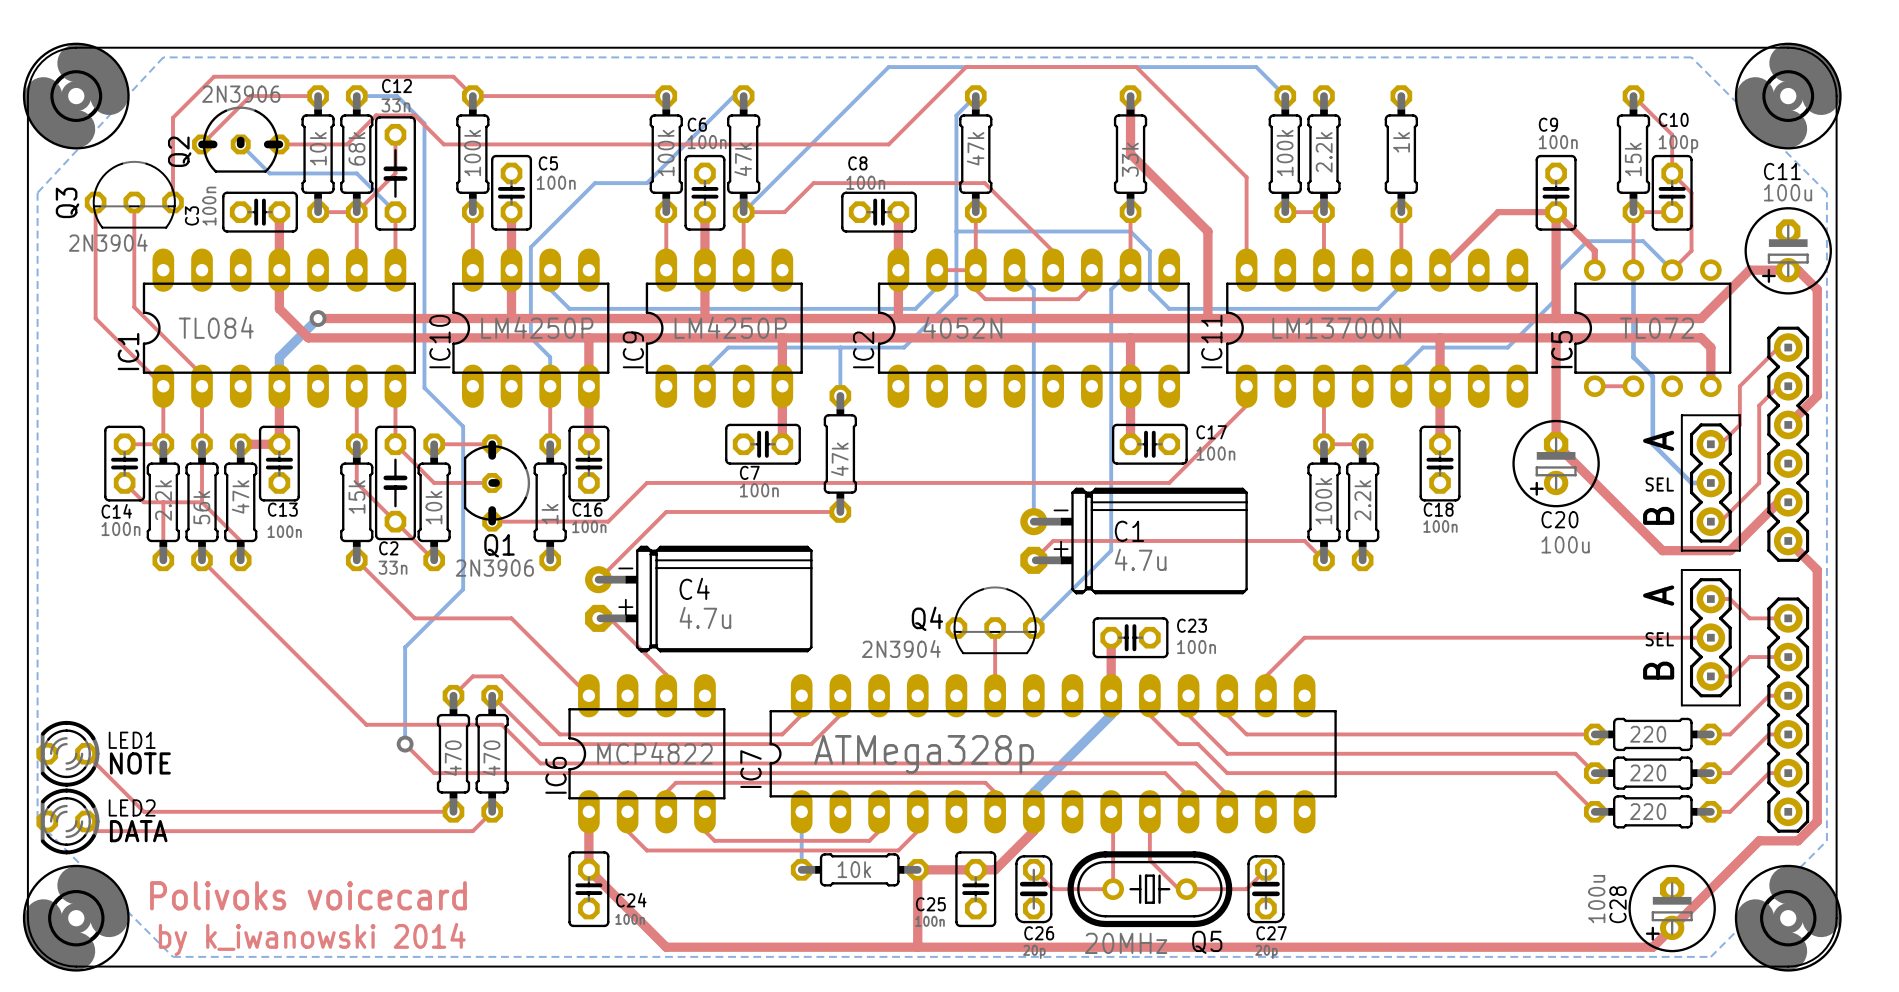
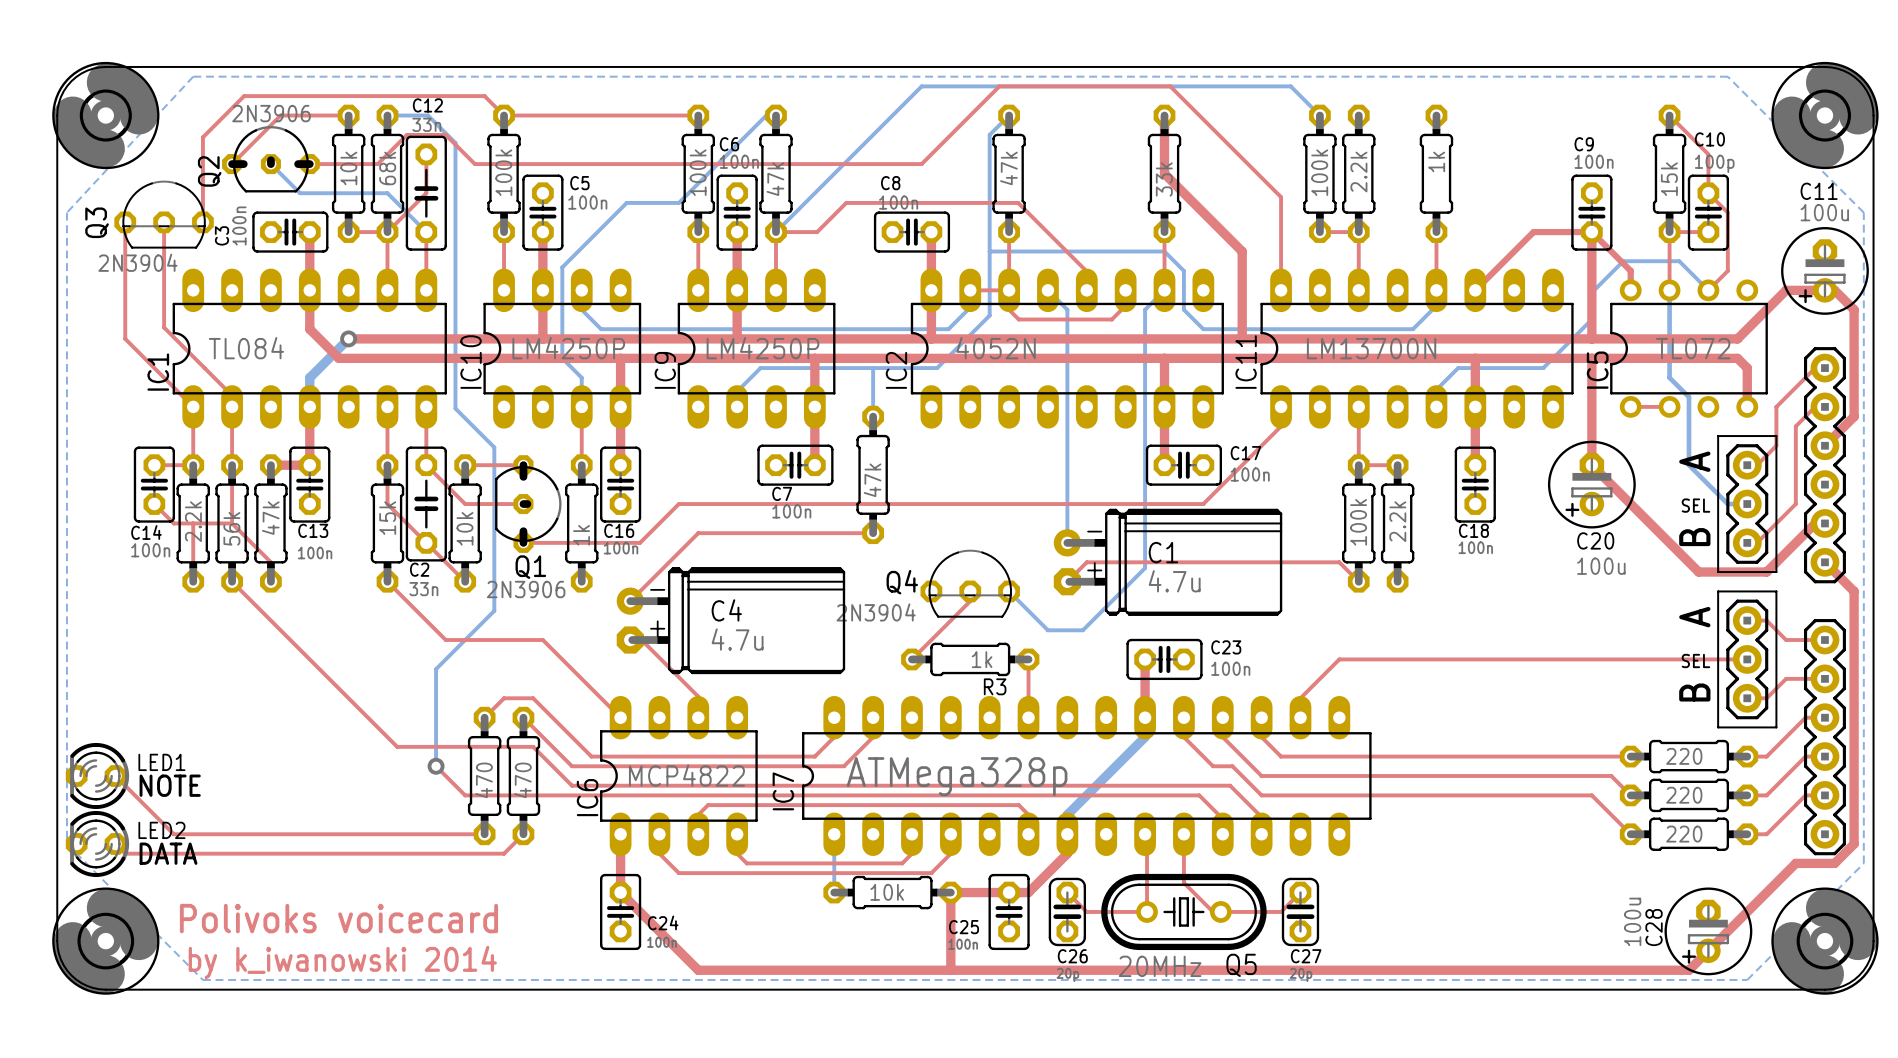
bottom track: (1111, 546) (1111, 550) (1033, 628) -> (1145, 568) (1082, 630) (1047, 630) (1009, 591)
top track: none -> (970, 591) (970, 601) (911, 659)
Q4 position: (995, 620) -> (970, 583)
R3: none -> 1k (970, 659)

